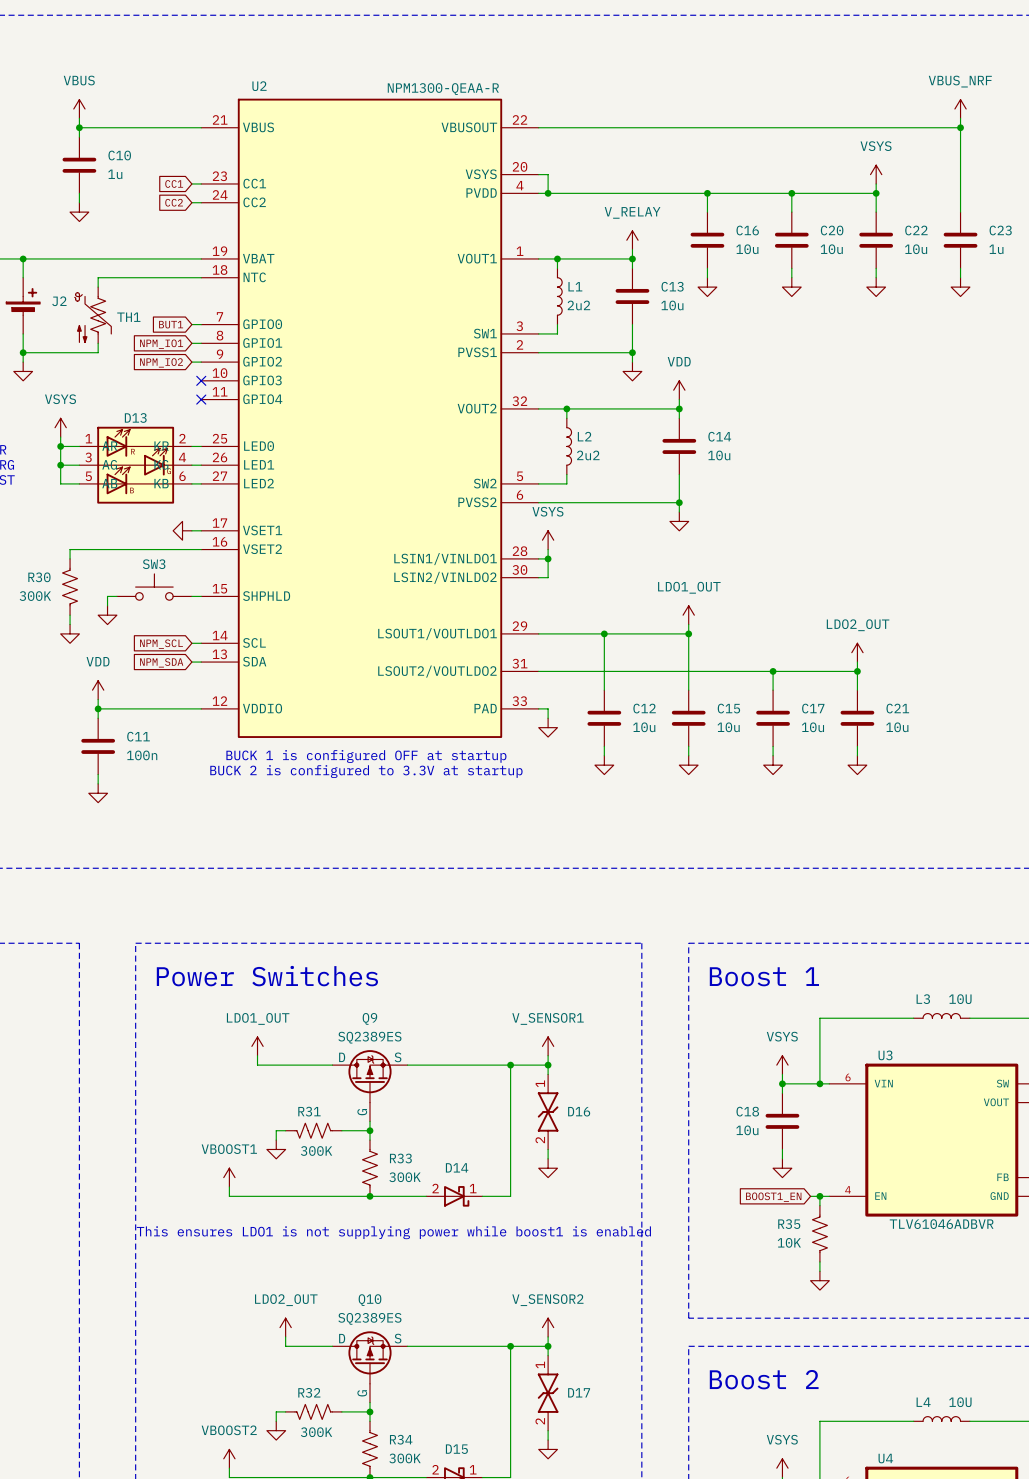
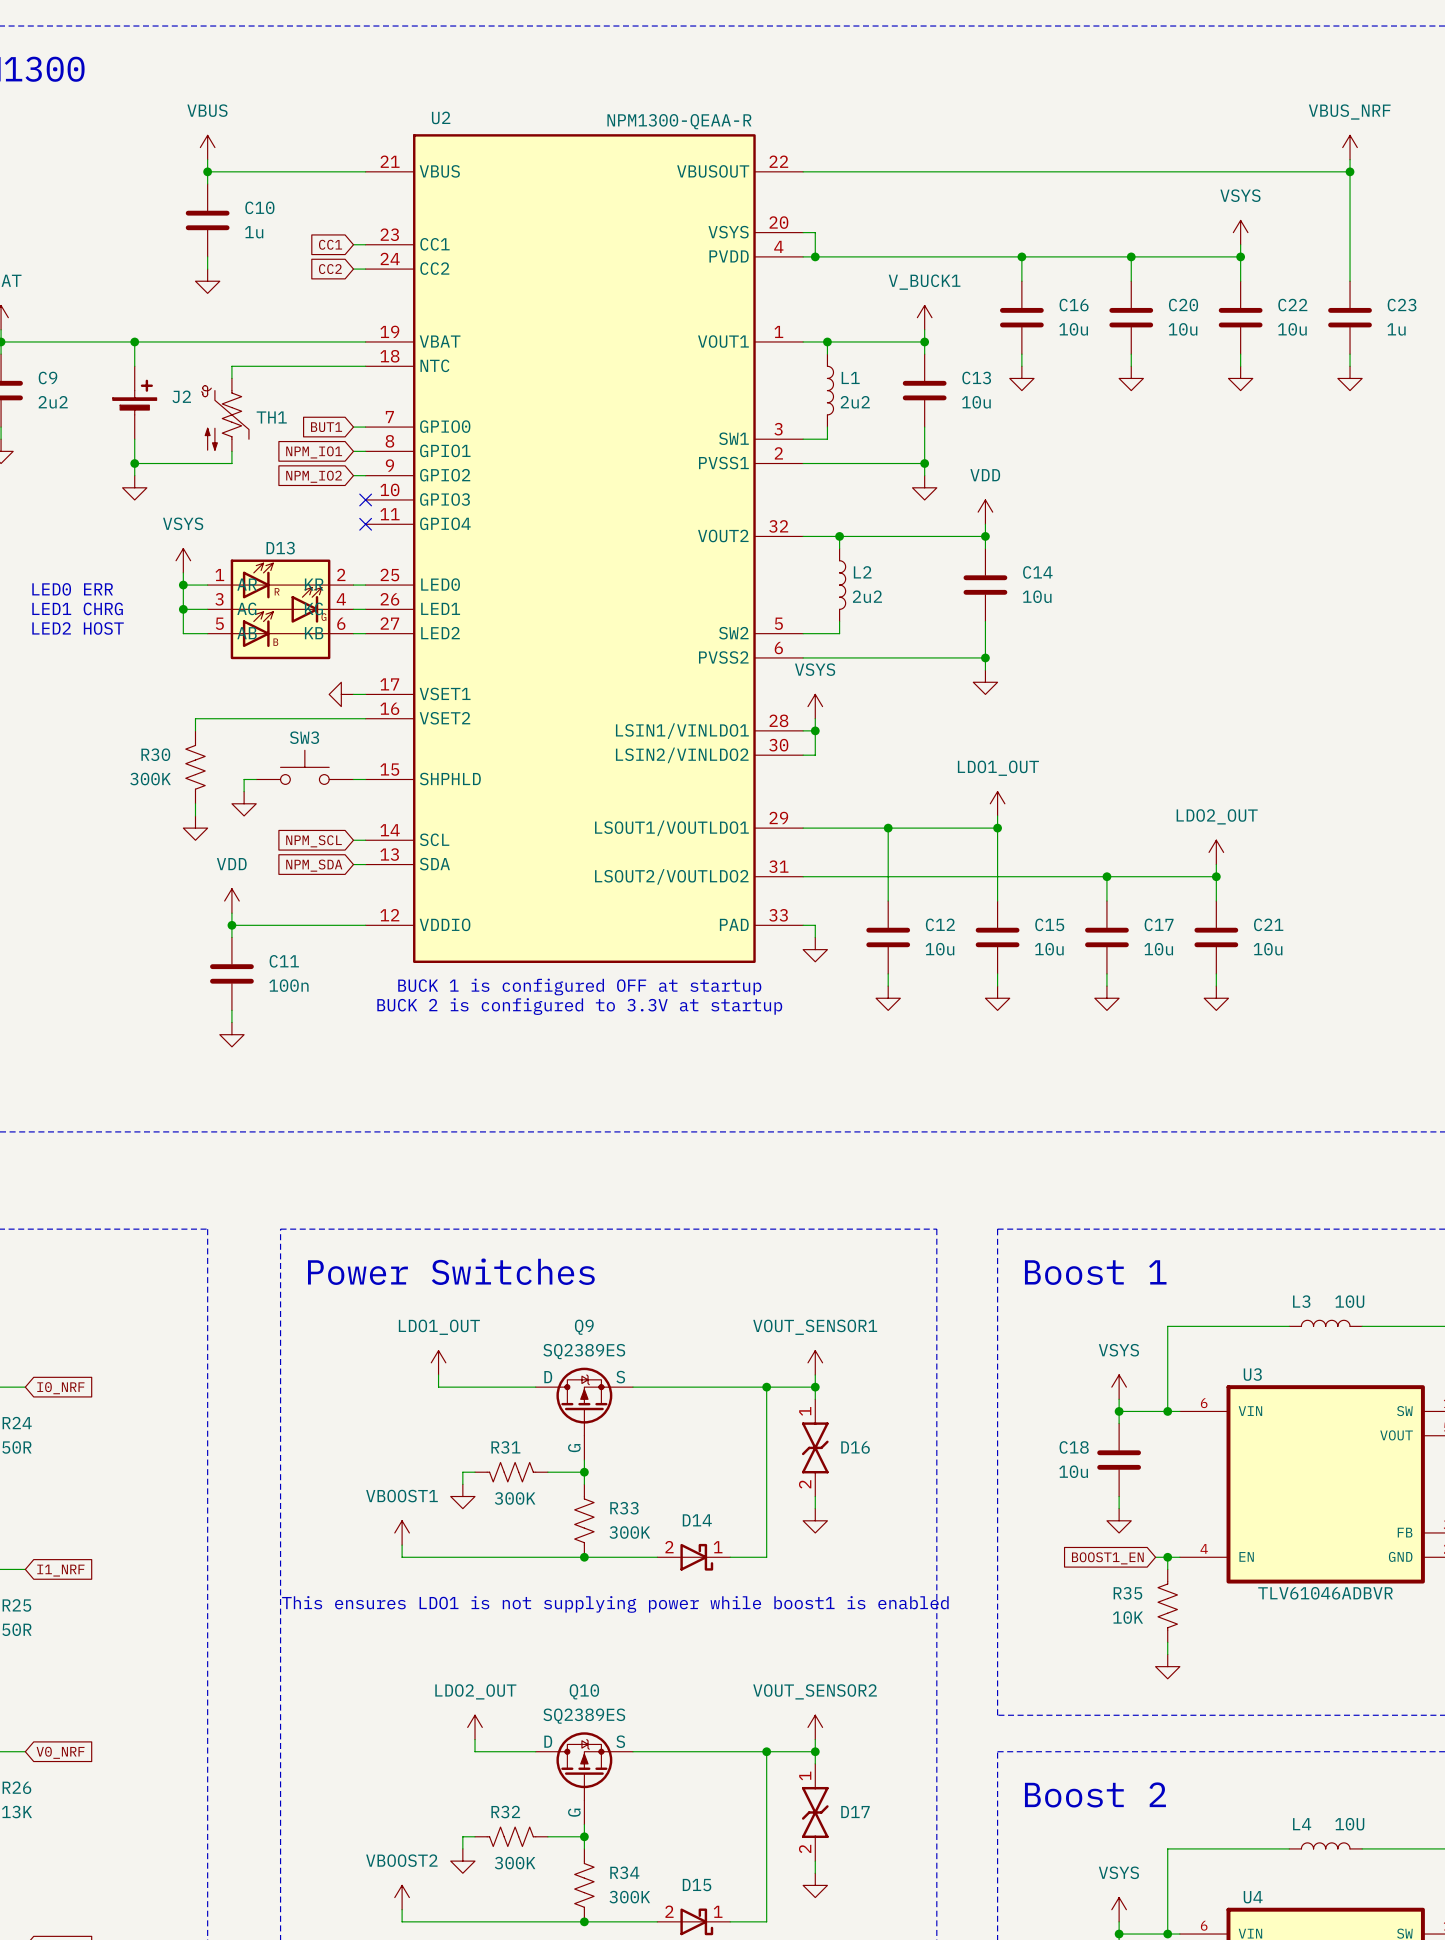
power symbol: V_RELAY (632, 240) -> V_BUCK1 (924, 317)
power symbol: V_SENSOR1 (548, 1046) -> VOUT_SENSOR1 (815, 1362)
power symbol: V_SENSOR2 (548, 1327) -> VOUT_SENSOR2 (815, 1727)

